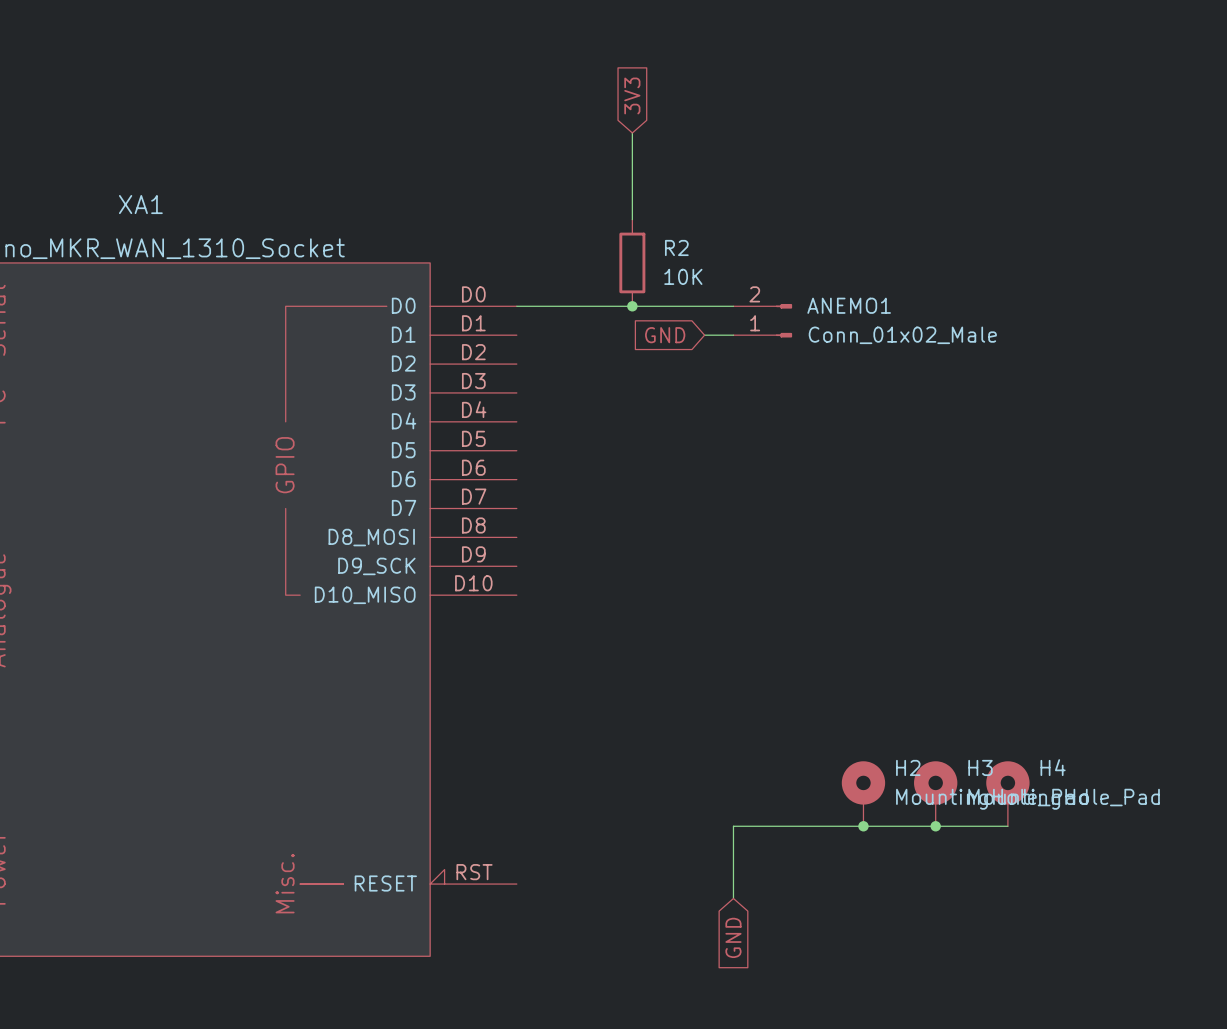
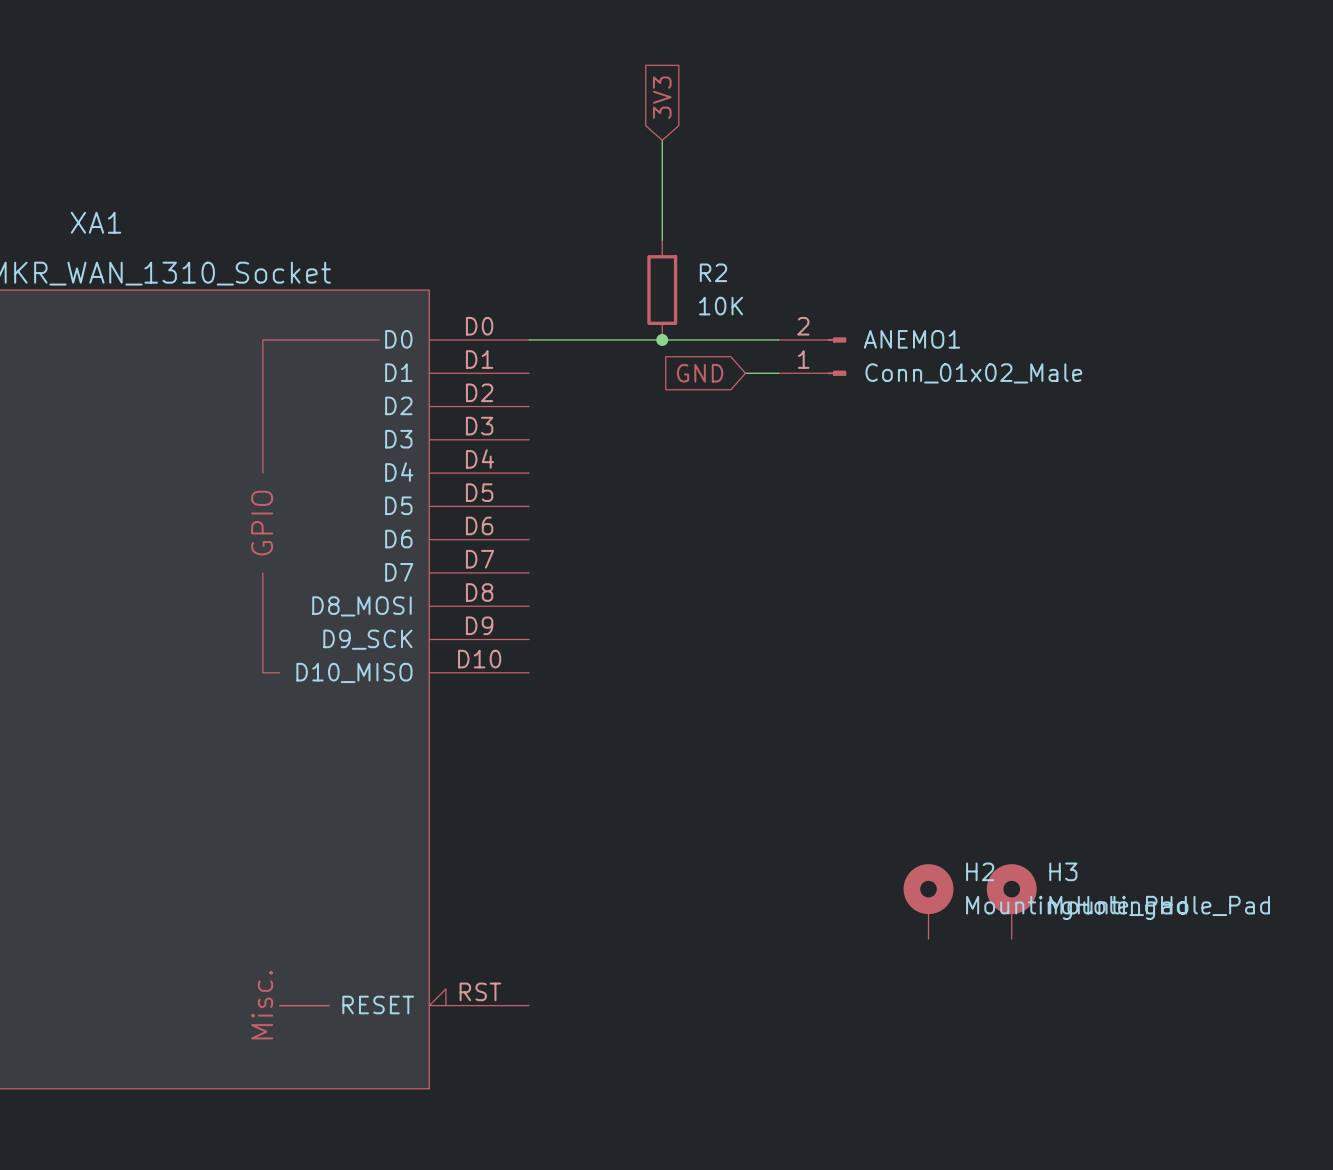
H4: (1007, 793) -> none
junction: (863, 826) -> none
junction: (935, 826) -> none
wire: (1007, 826) (733, 826) (733, 898) -> none
global label: GND (733, 937) -> none

